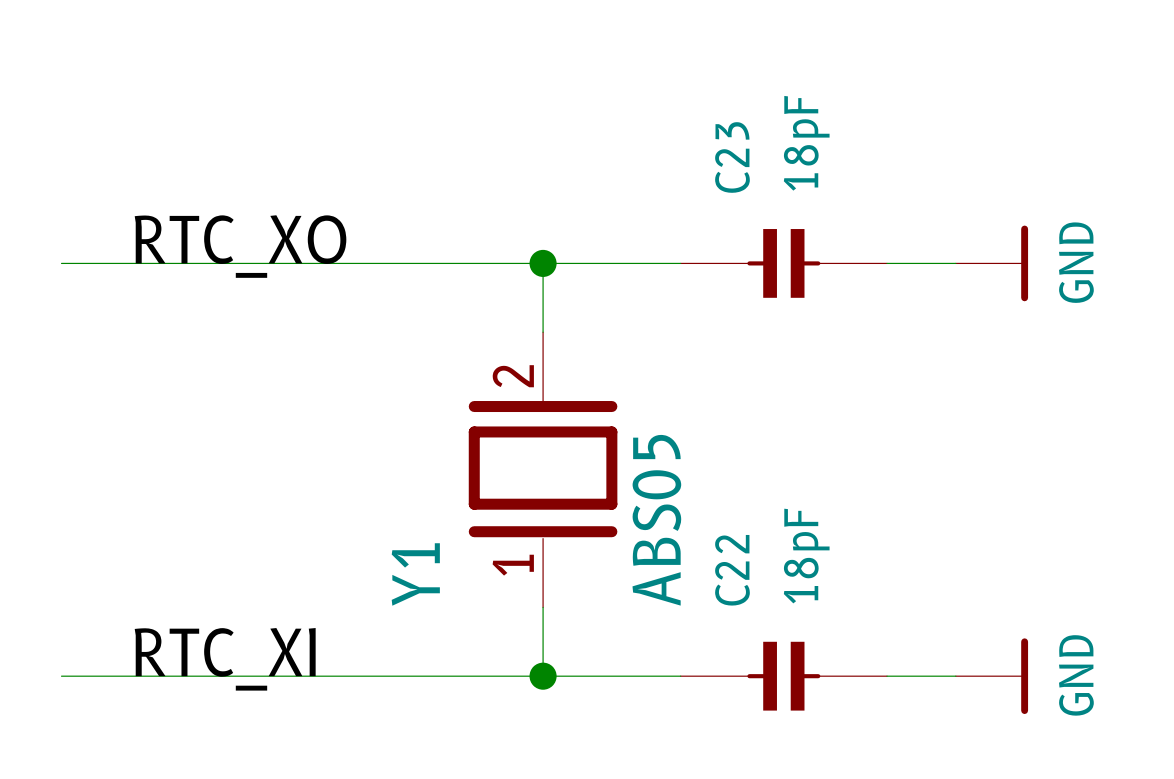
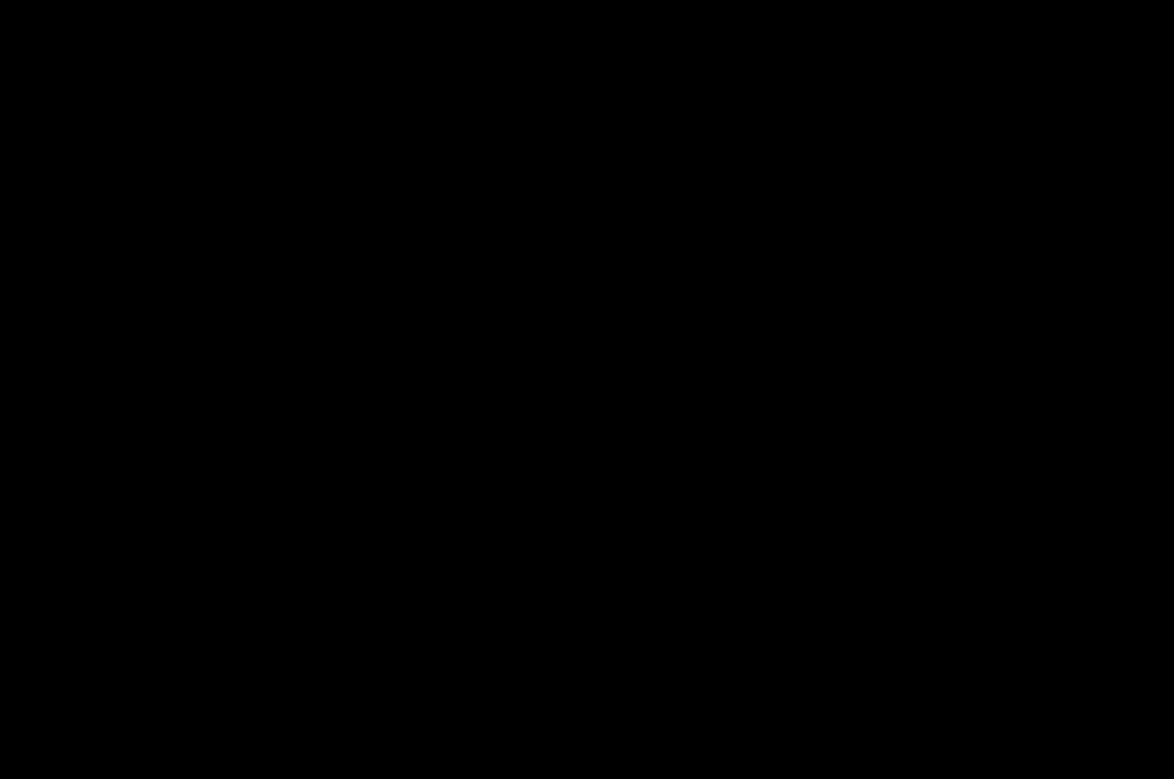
label: RTC_XO (240, 246) -> none
wire: (61, 263) (680, 263) -> none
wire: (543, 263) (543, 332) -> none
junction: (543, 263) -> none
C23: 18pF (783, 263) -> none
wire: (887, 263) (955, 263) -> none
power symbol: GND (991, 263) -> none
Y1: ABS05 (543, 469) -> none
wire: (543, 607) (543, 676) -> none
label: RTC_XI (225, 659) -> none
wire: (61, 676) (680, 676) -> none
junction: (543, 676) -> none
C22: 18pF (783, 676) -> none
wire: (887, 676) (955, 676) -> none
power symbol: GND (991, 676) -> none

